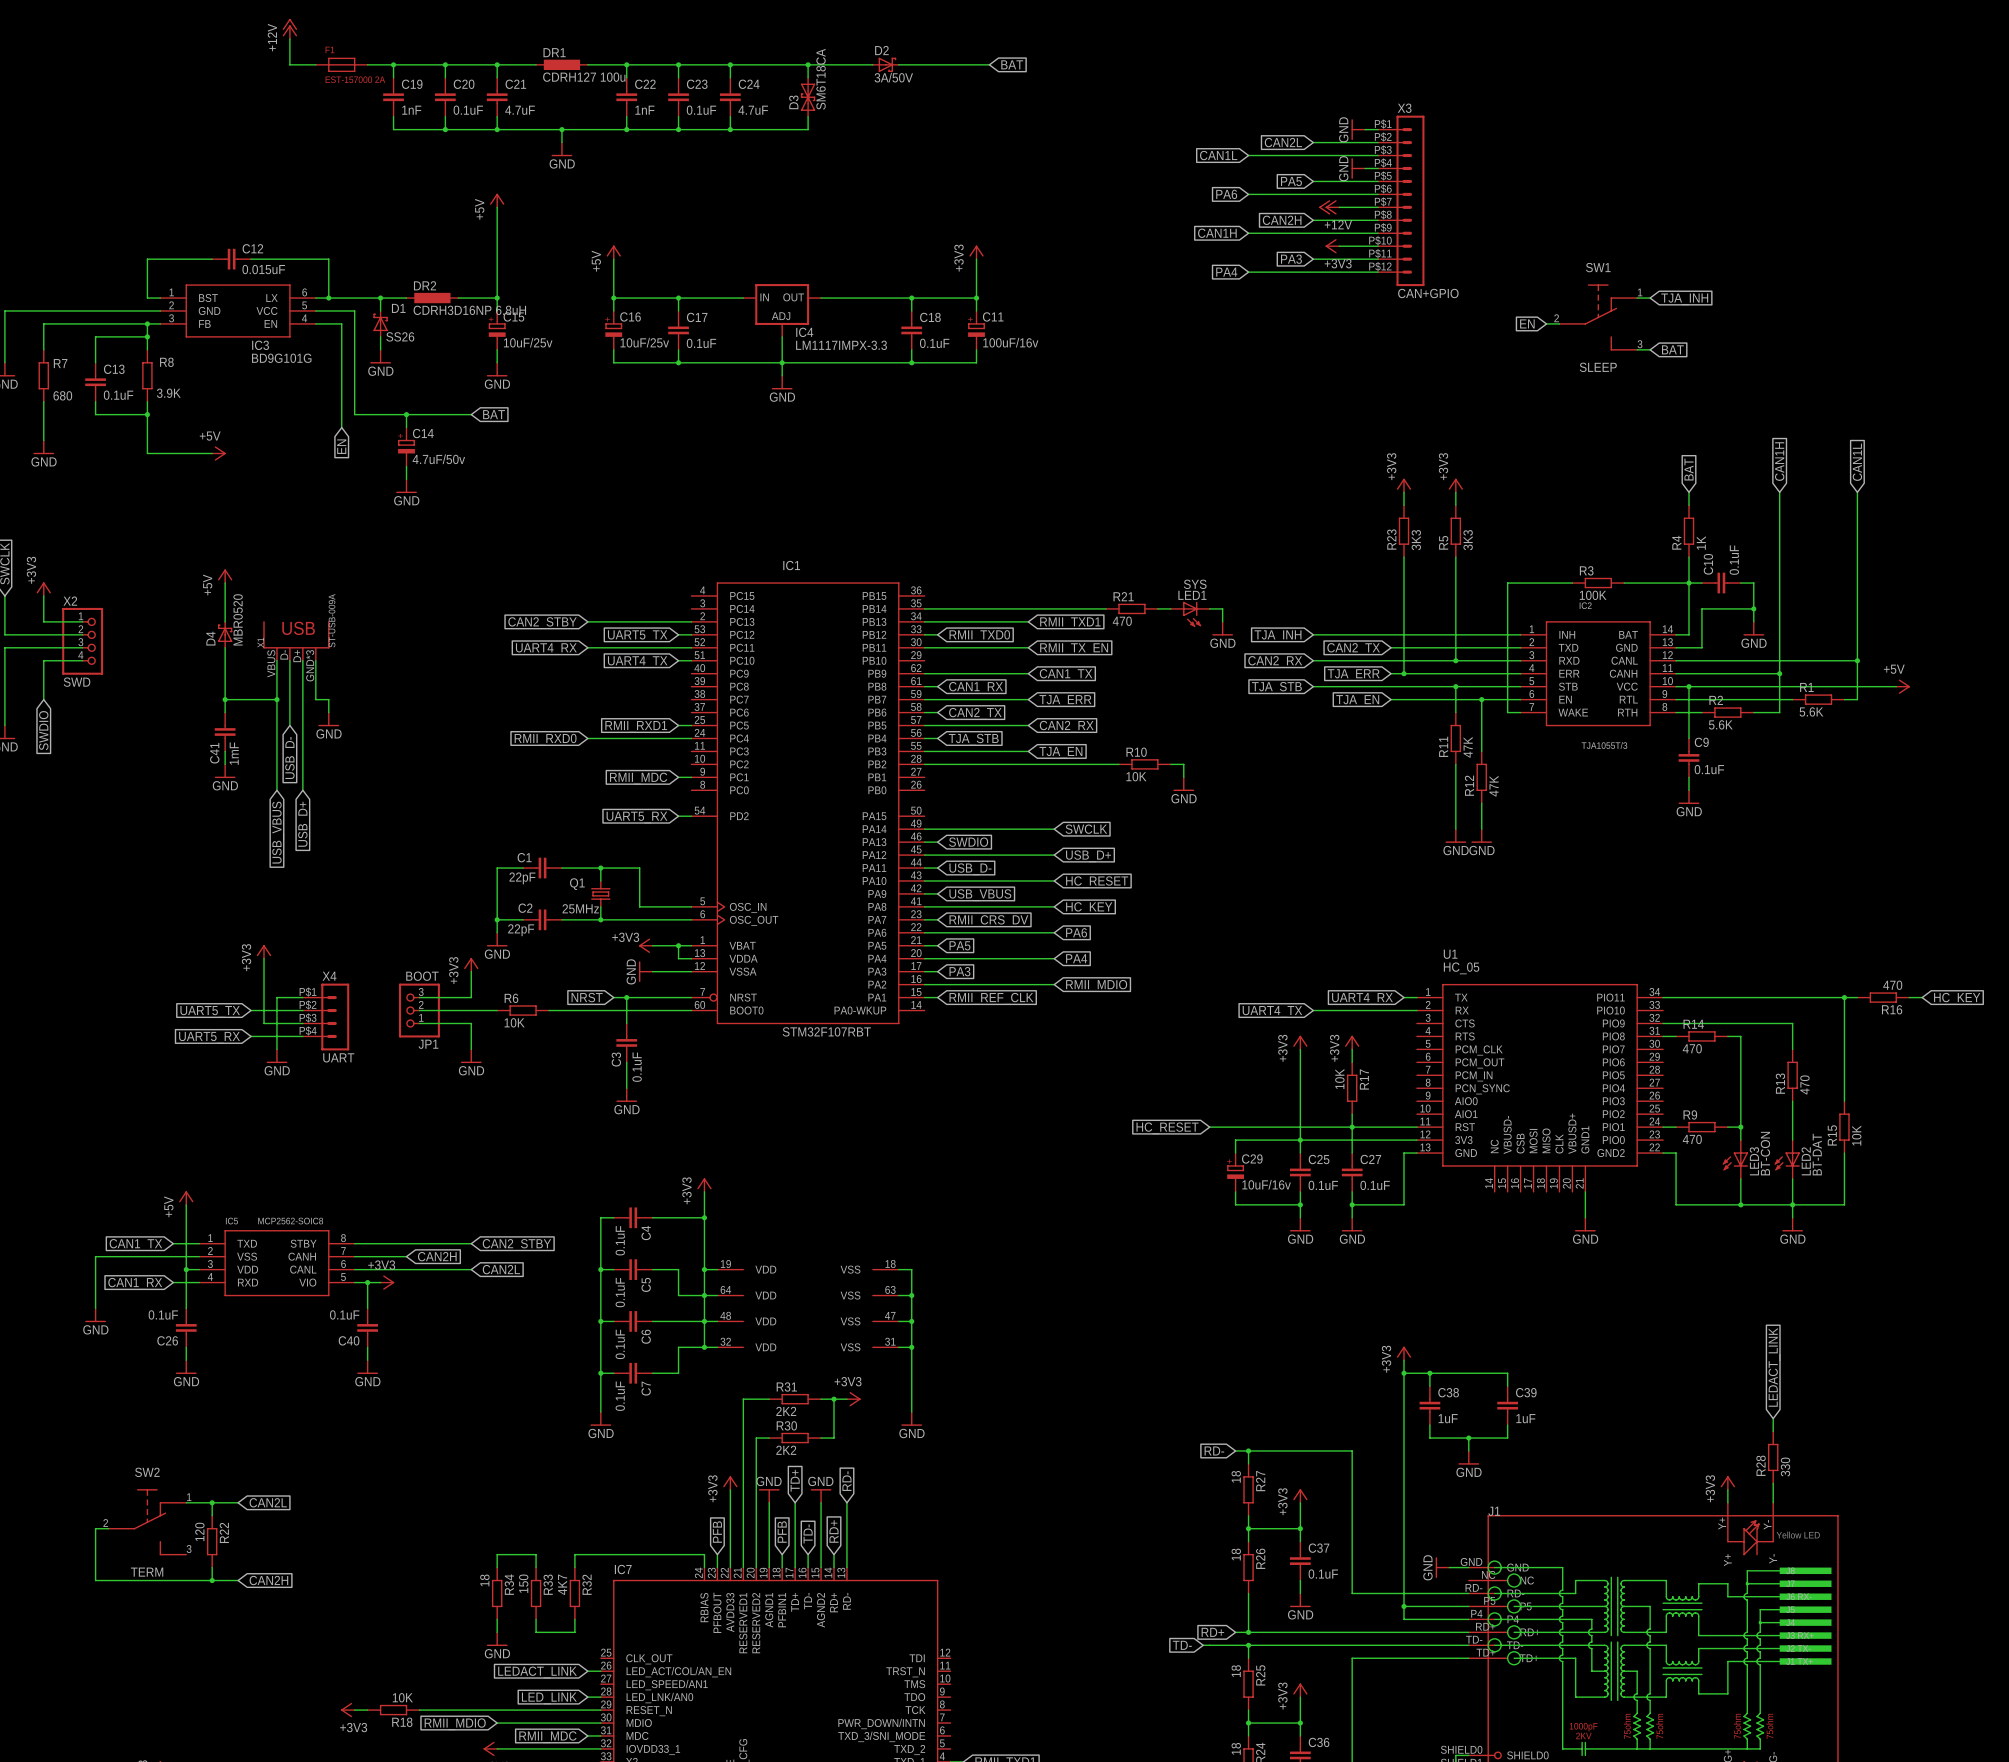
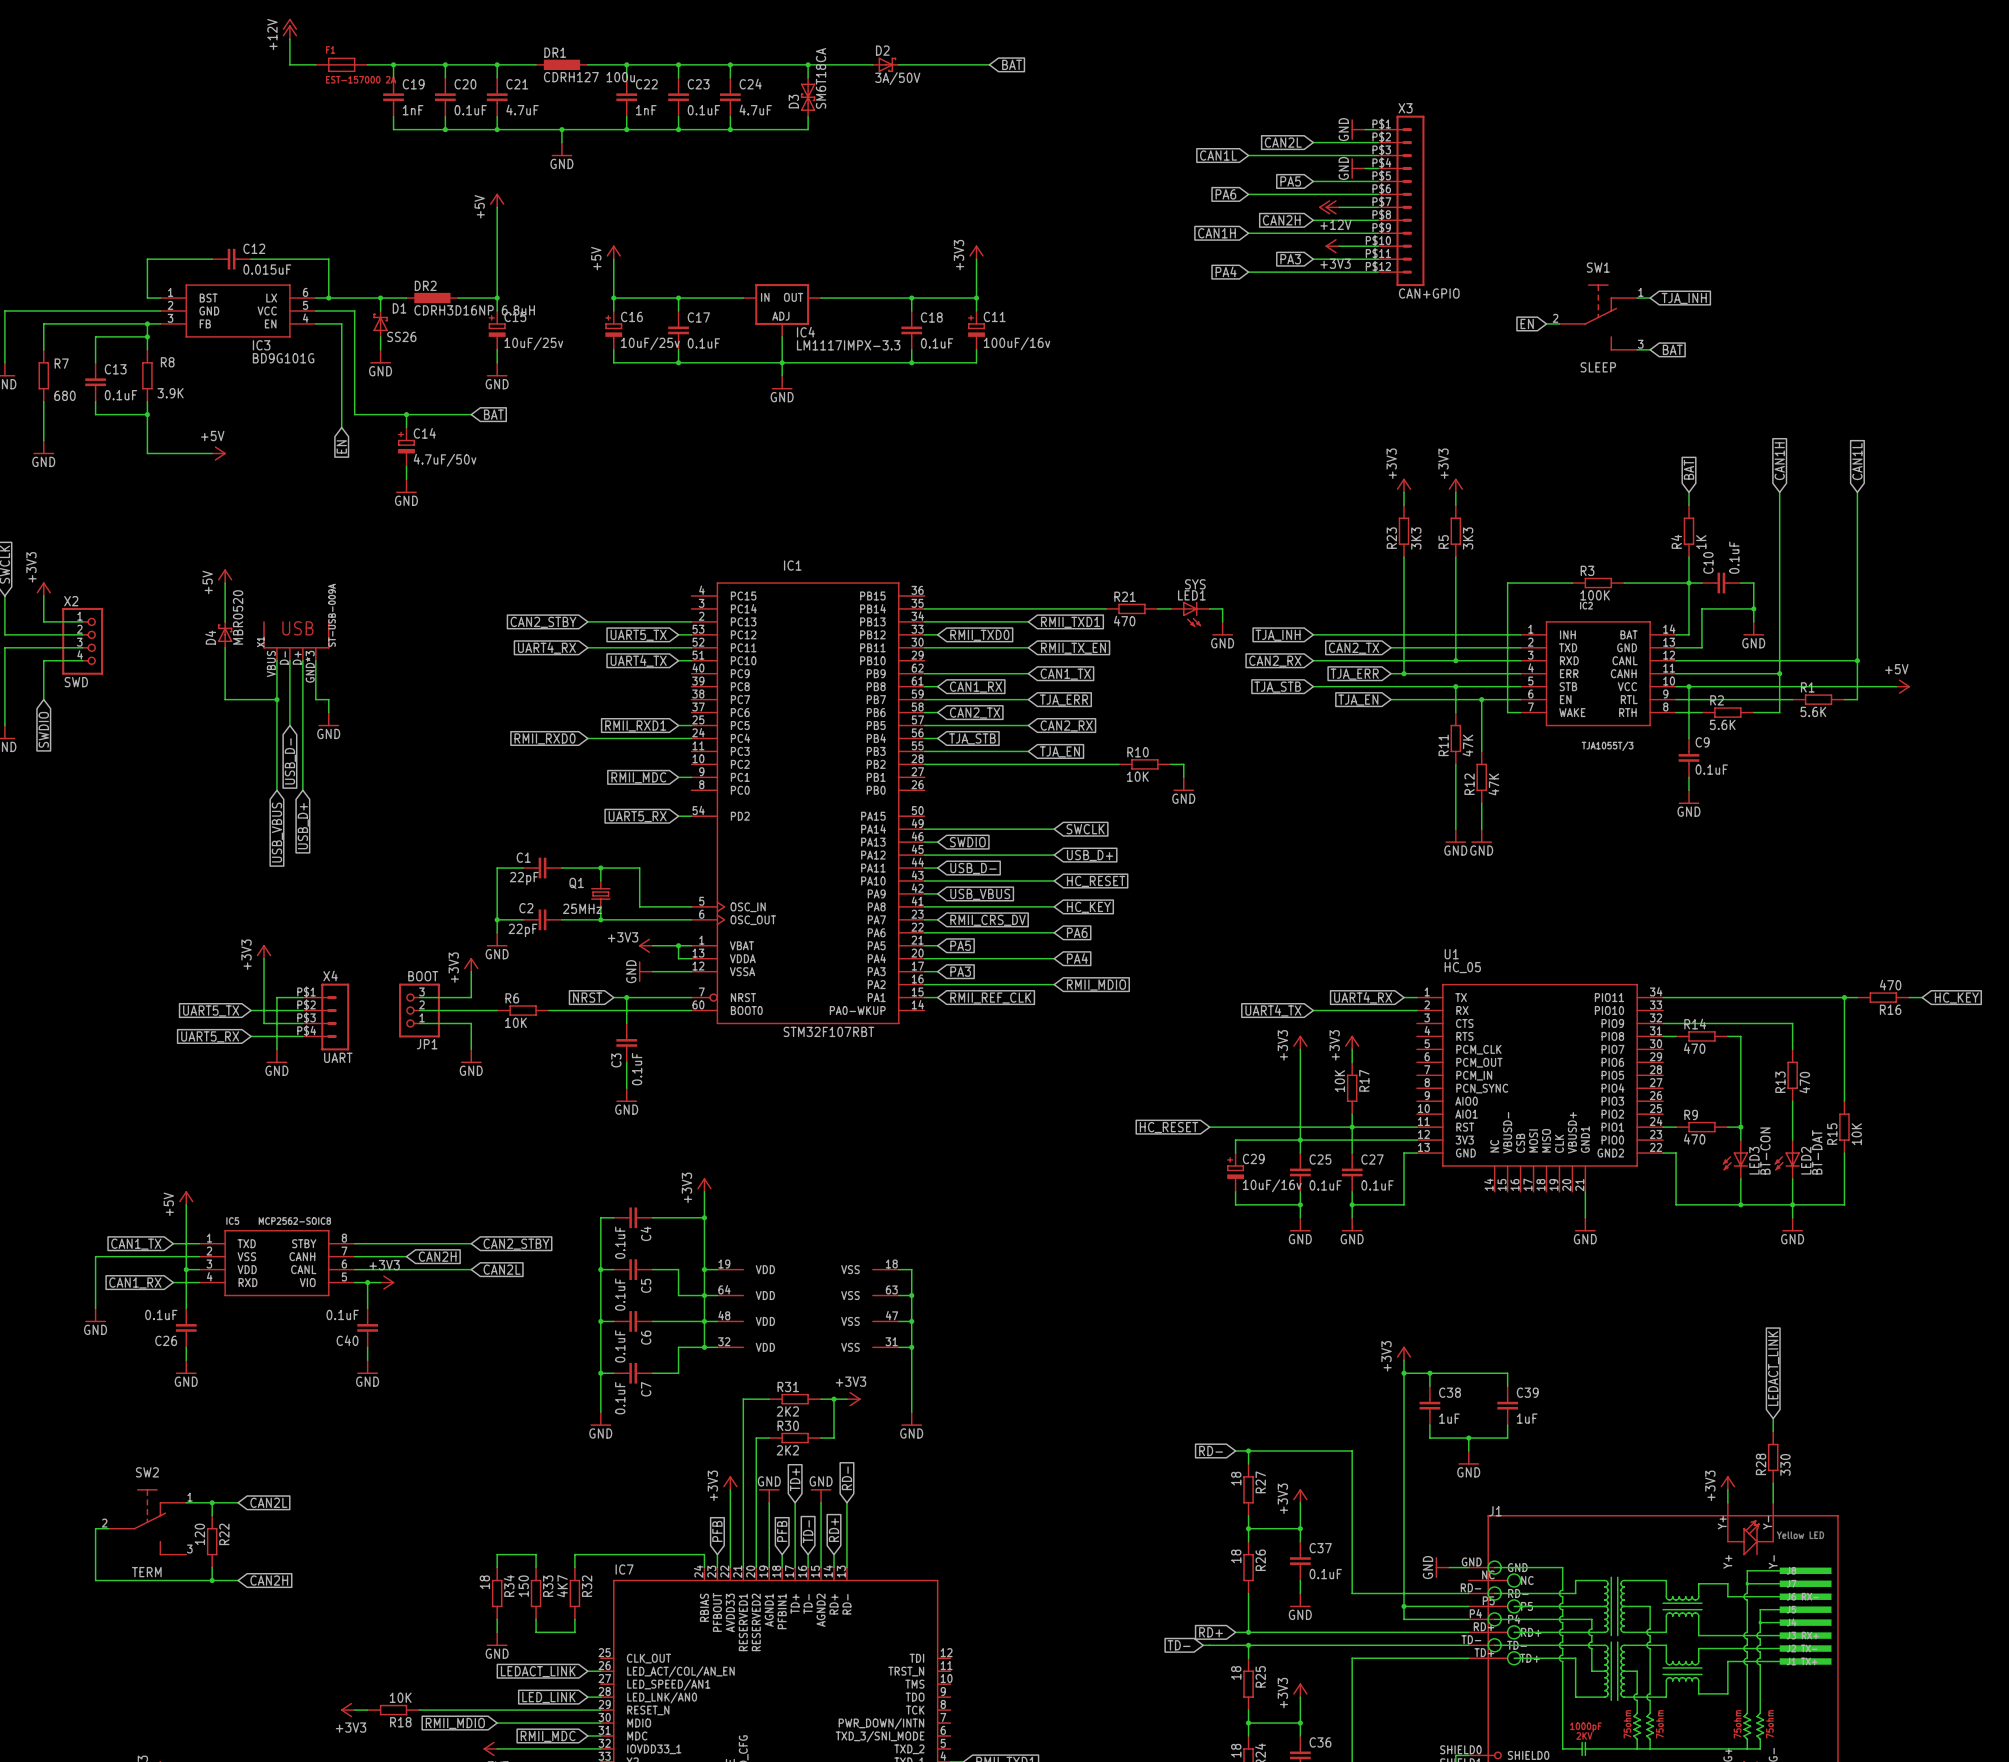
wire: (225, 699) (225, 712) -> none
junction: (225, 699) -> none
C41: 1mF (225, 732) -> none
wire: (225, 751) (225, 764) -> none
power symbol: GND (225, 771) -> none

